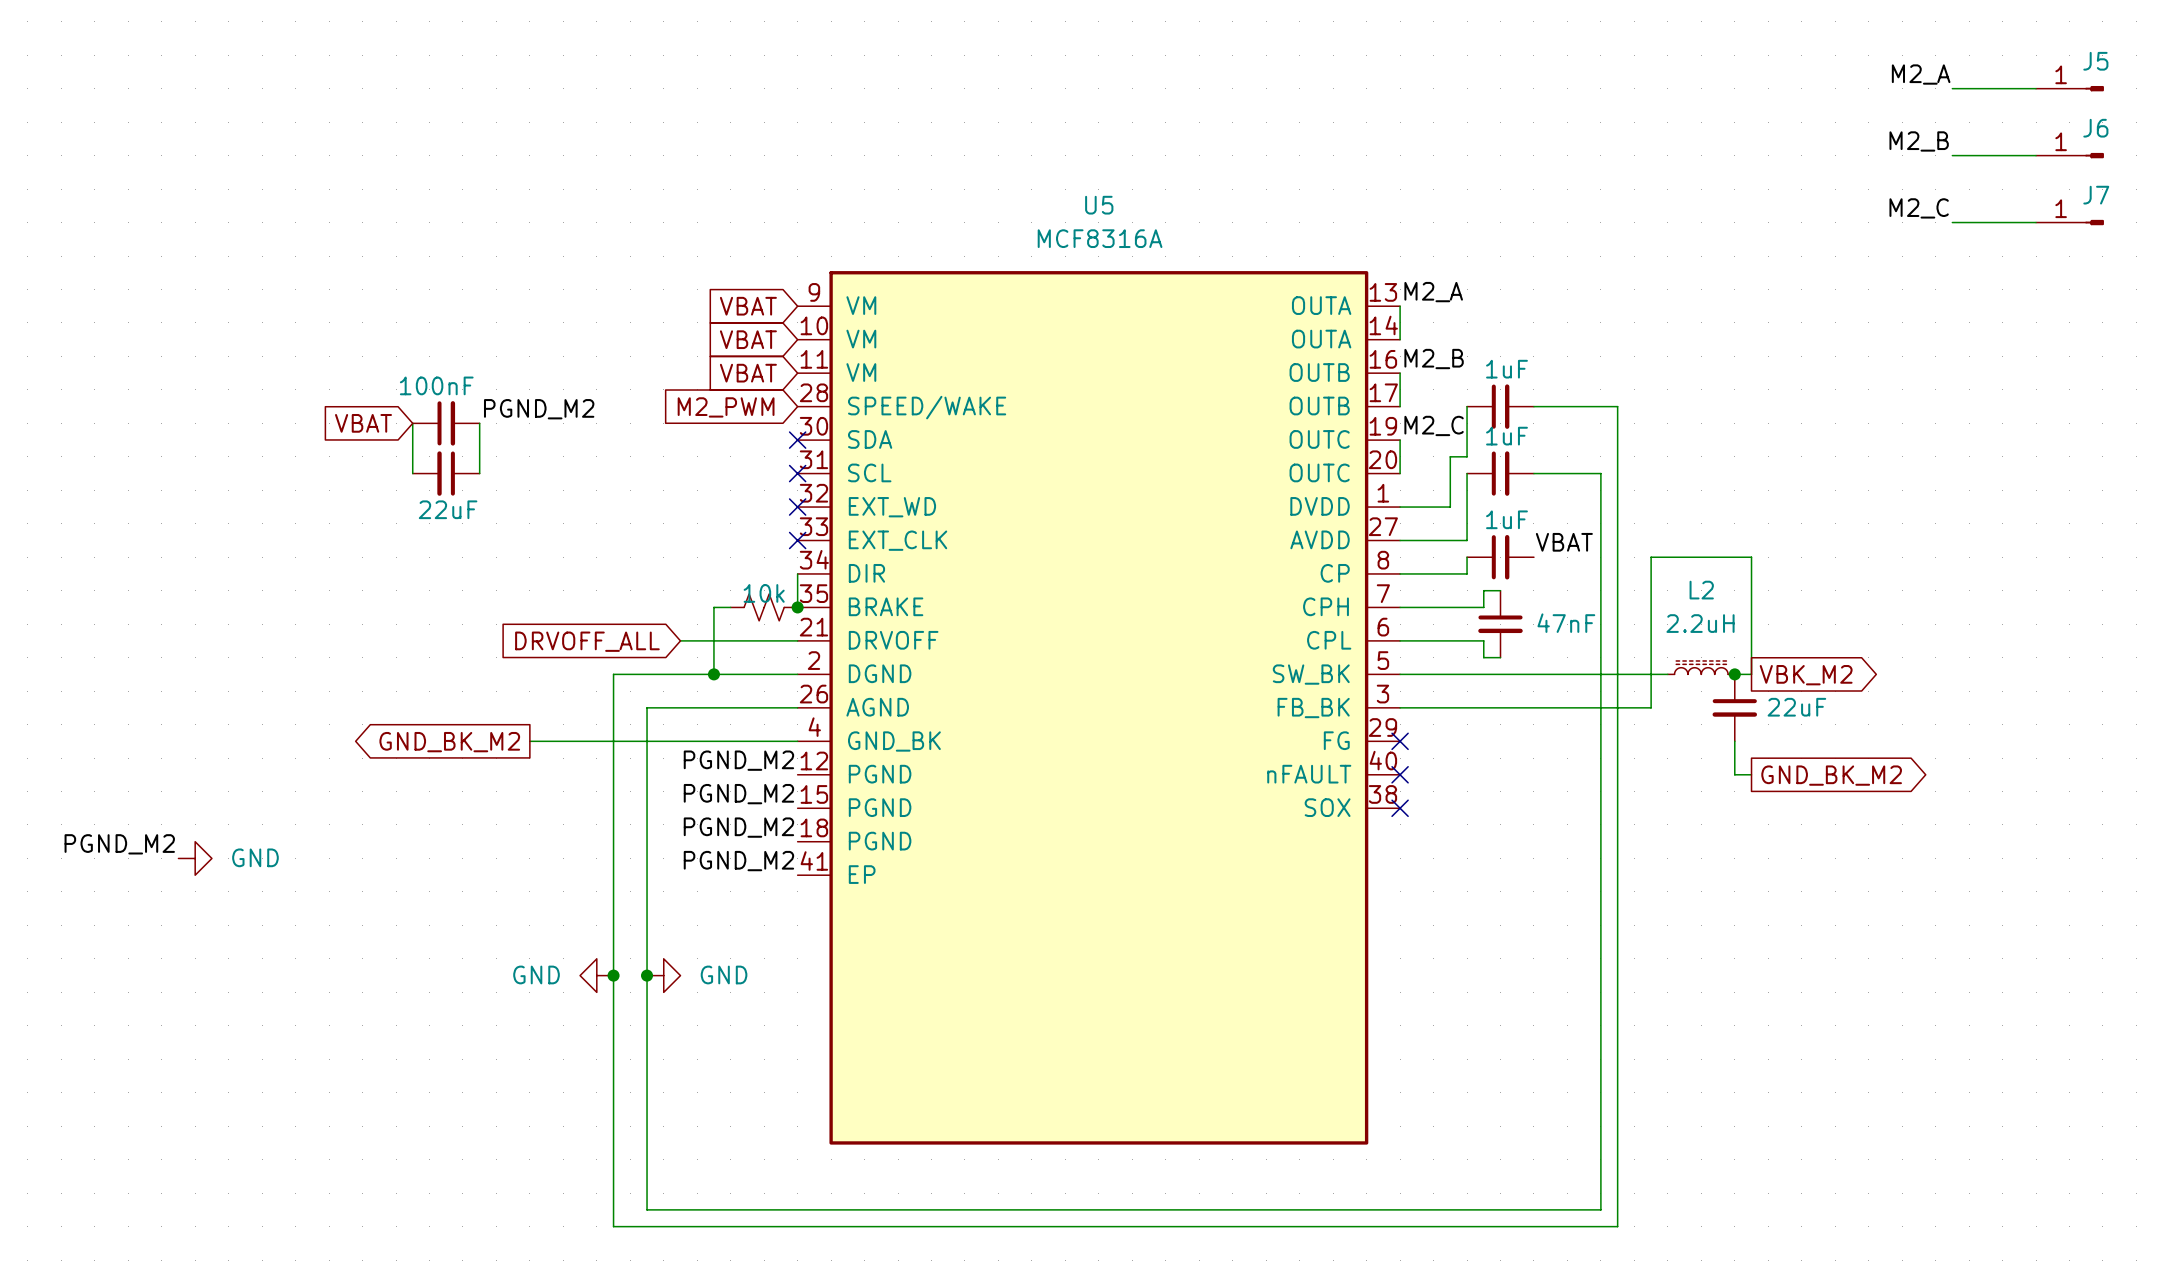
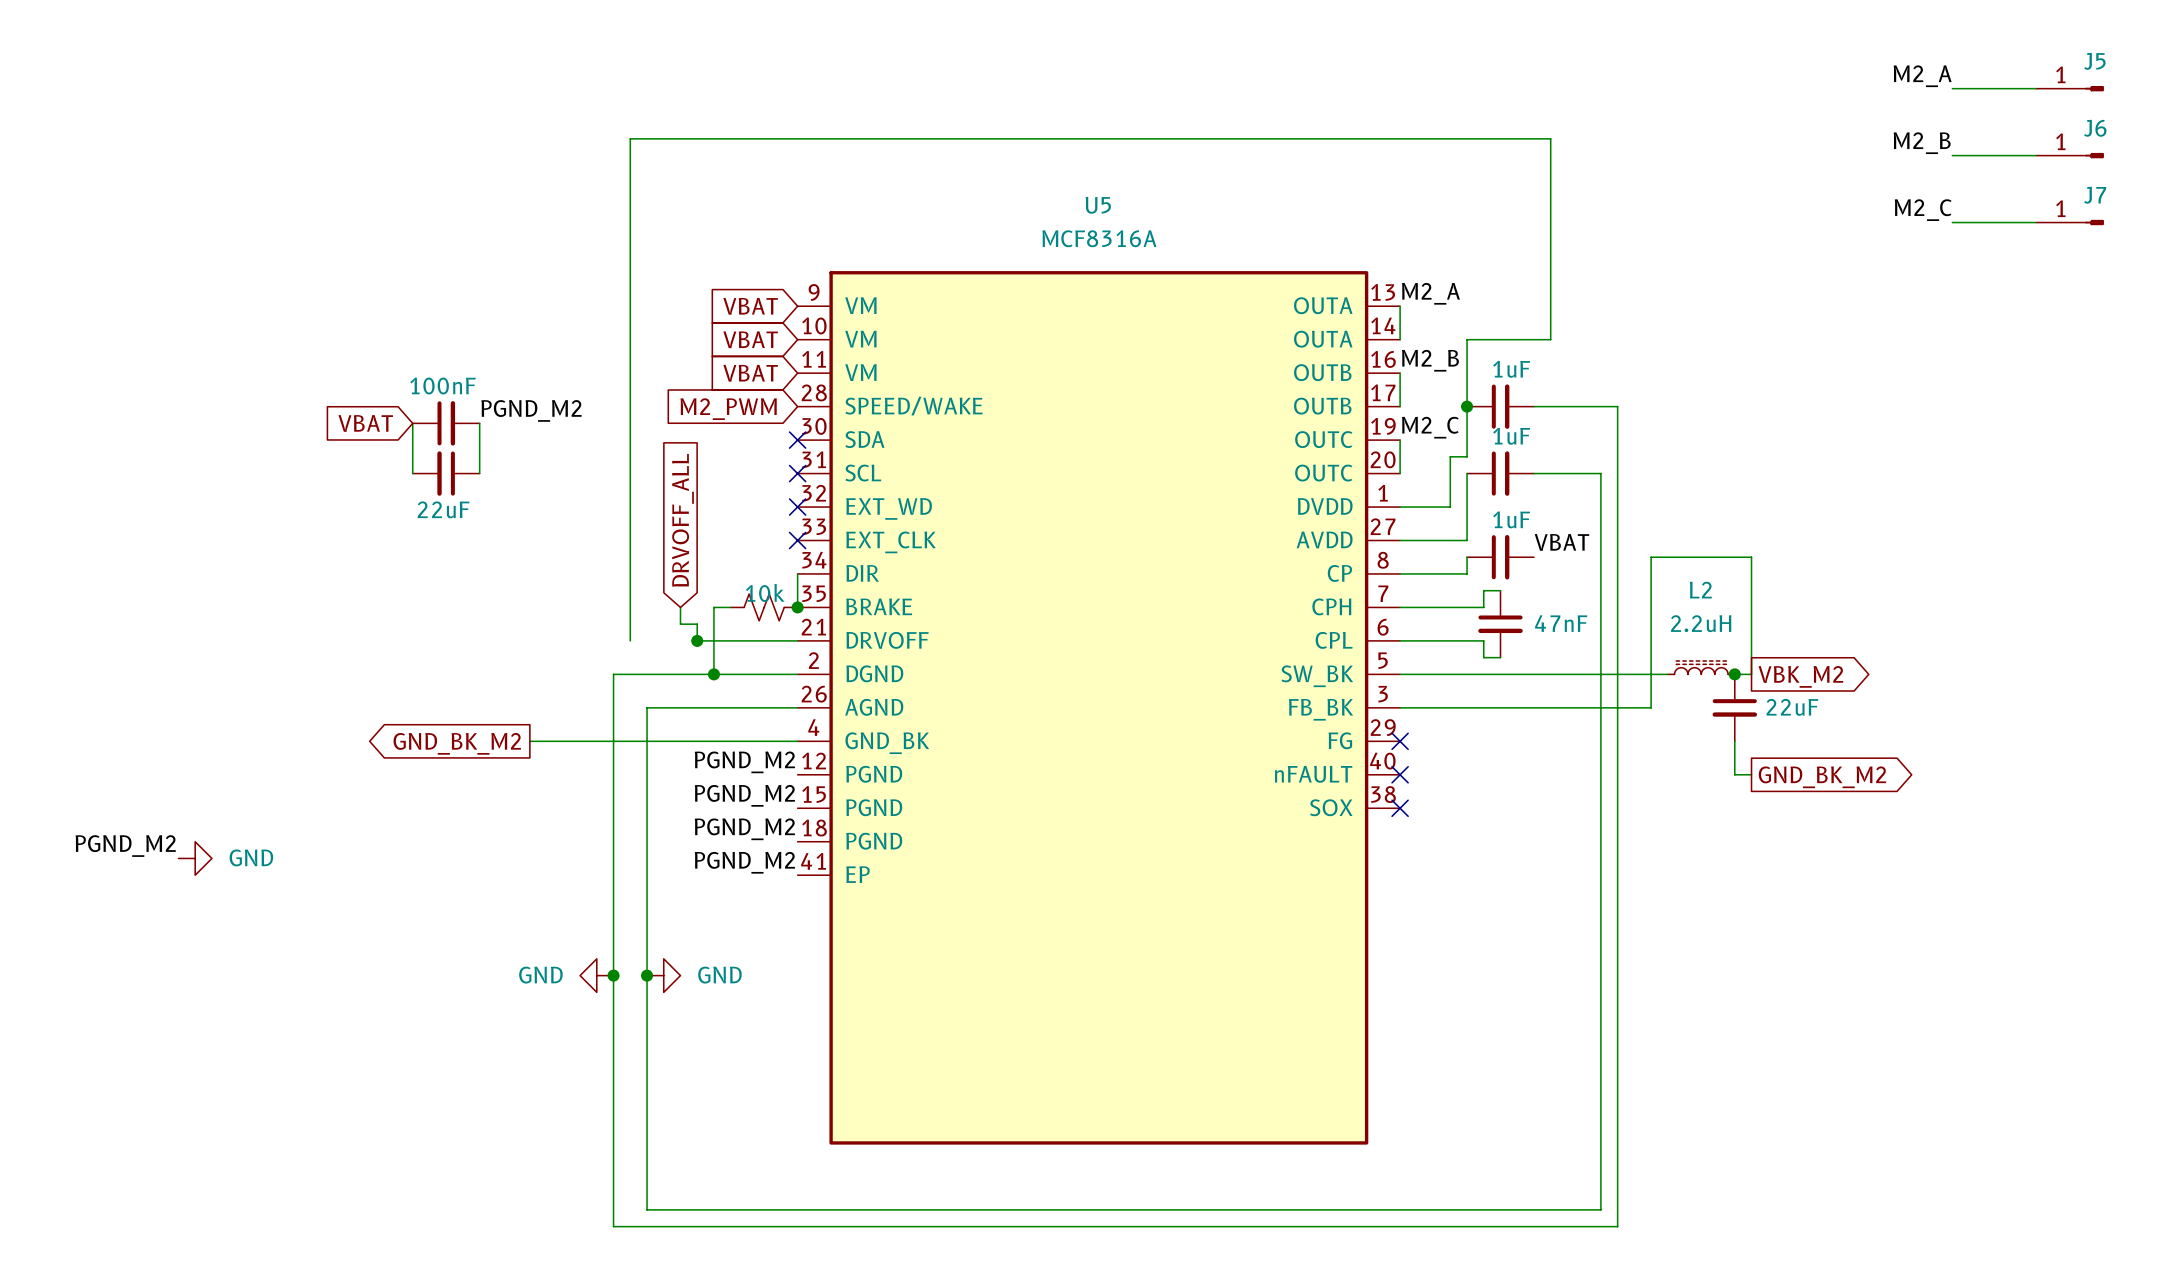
wire: none -> (1467, 406) (1467, 339) (1550, 339) (1550, 138) (630, 138) (630, 640)
junction: none -> (1467, 406)
wire: (680, 640) (697, 640) -> (680, 607) (680, 624) (697, 624) (697, 640)
junction: none -> (697, 640)
global label rotation: 0° (587, 641) -> 90° clockwise (682, 520)

